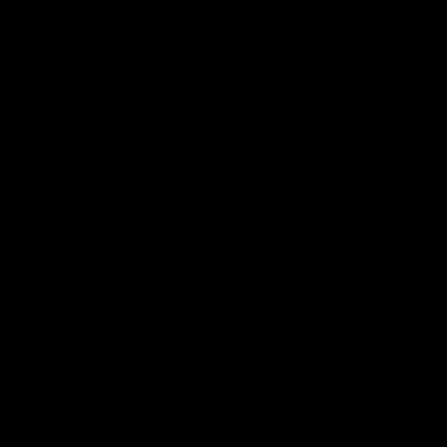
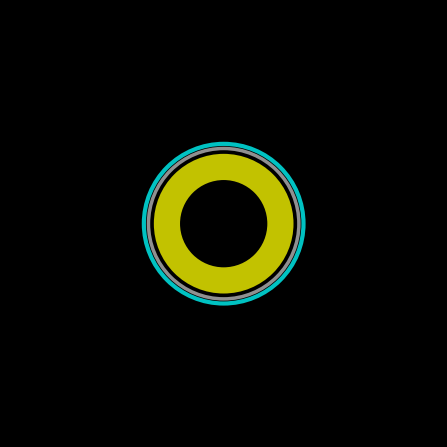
part: none -> (223, 223)

